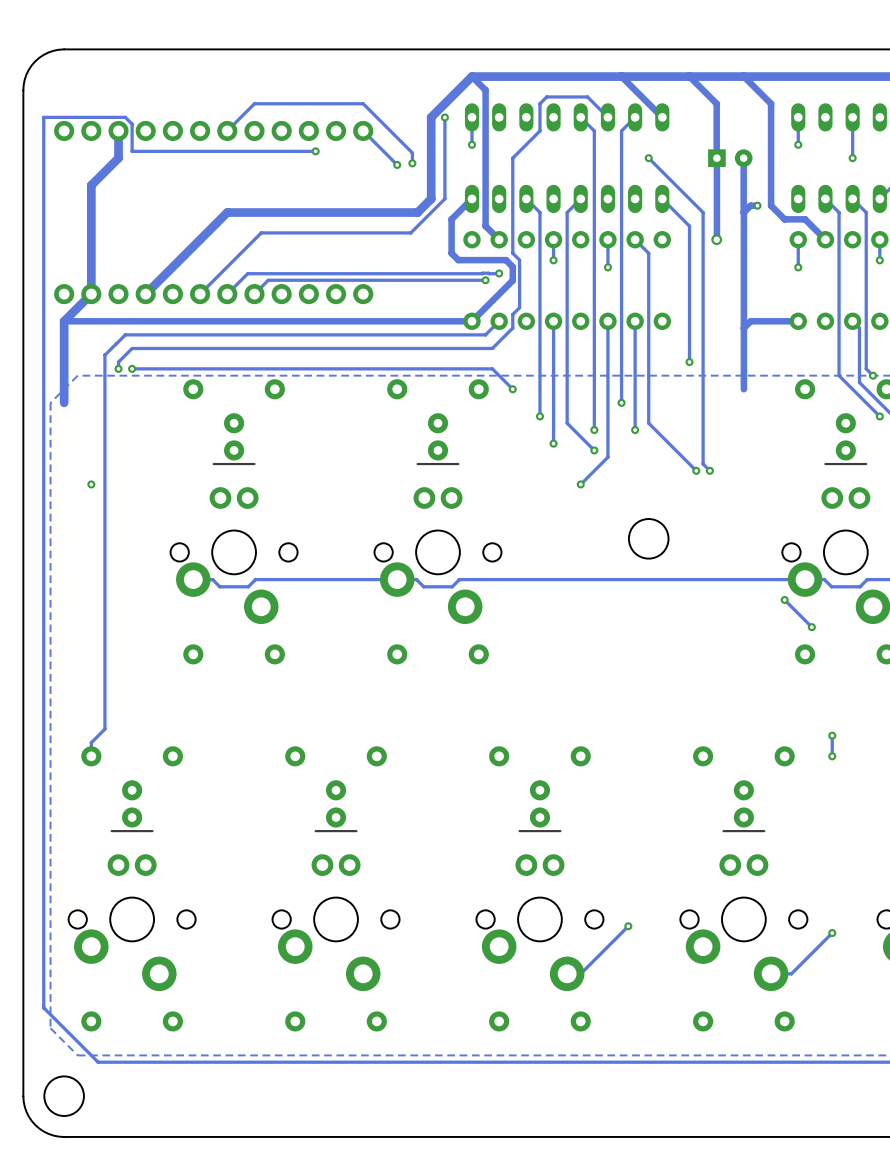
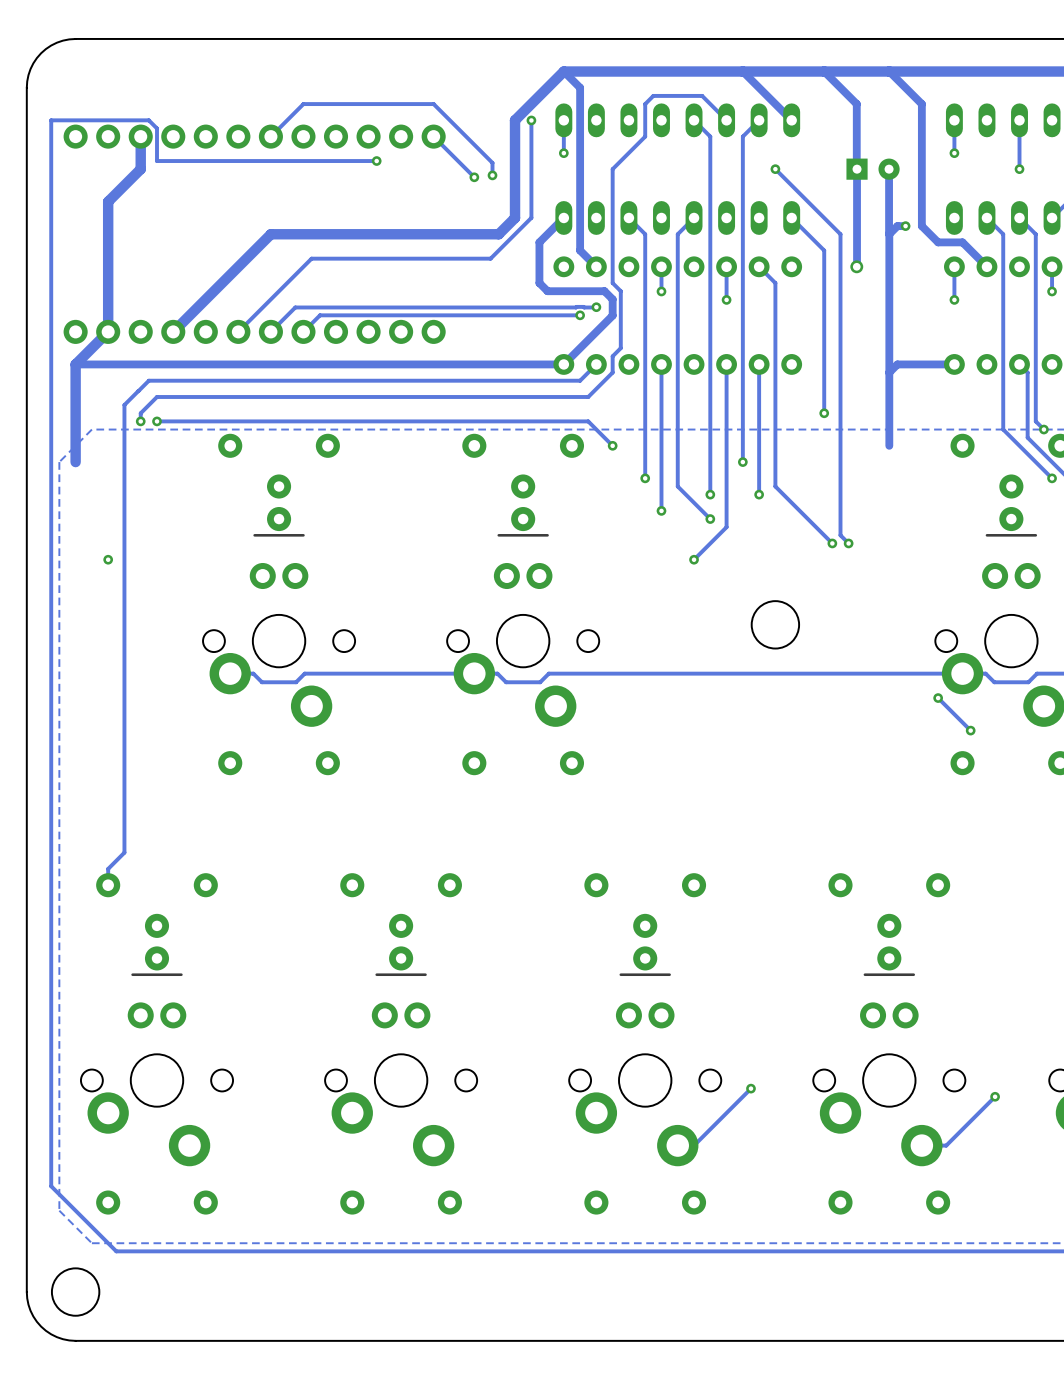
track: (832, 735) (832, 756) -> none
via: (832, 735) -> none
via: (832, 756) -> none

